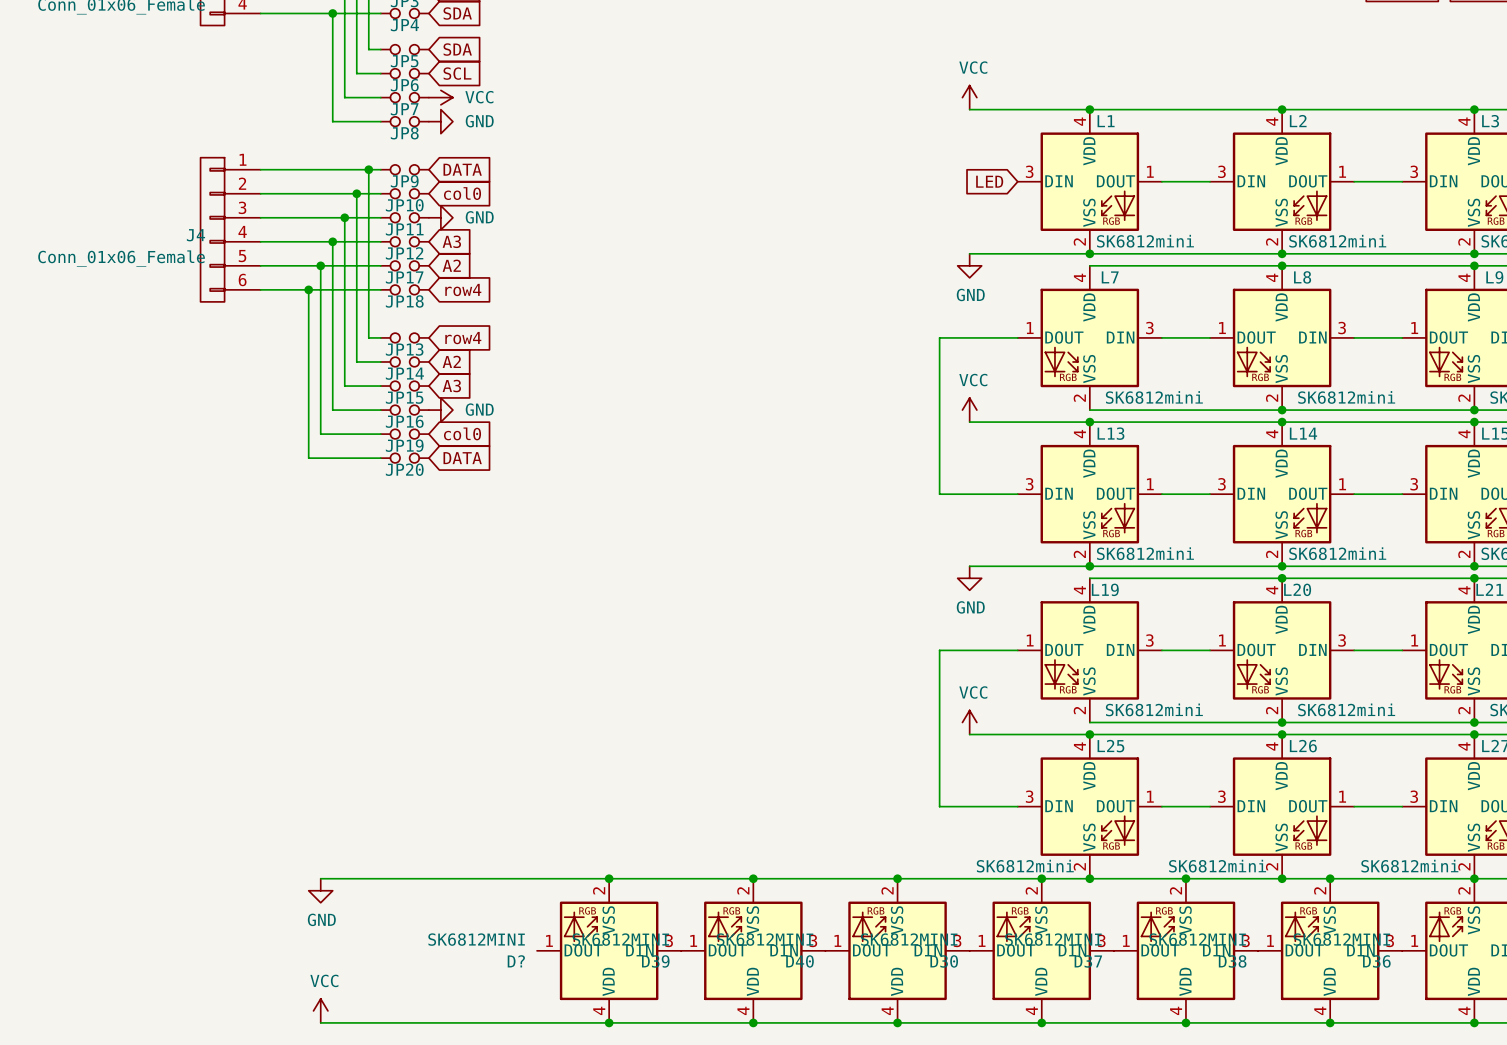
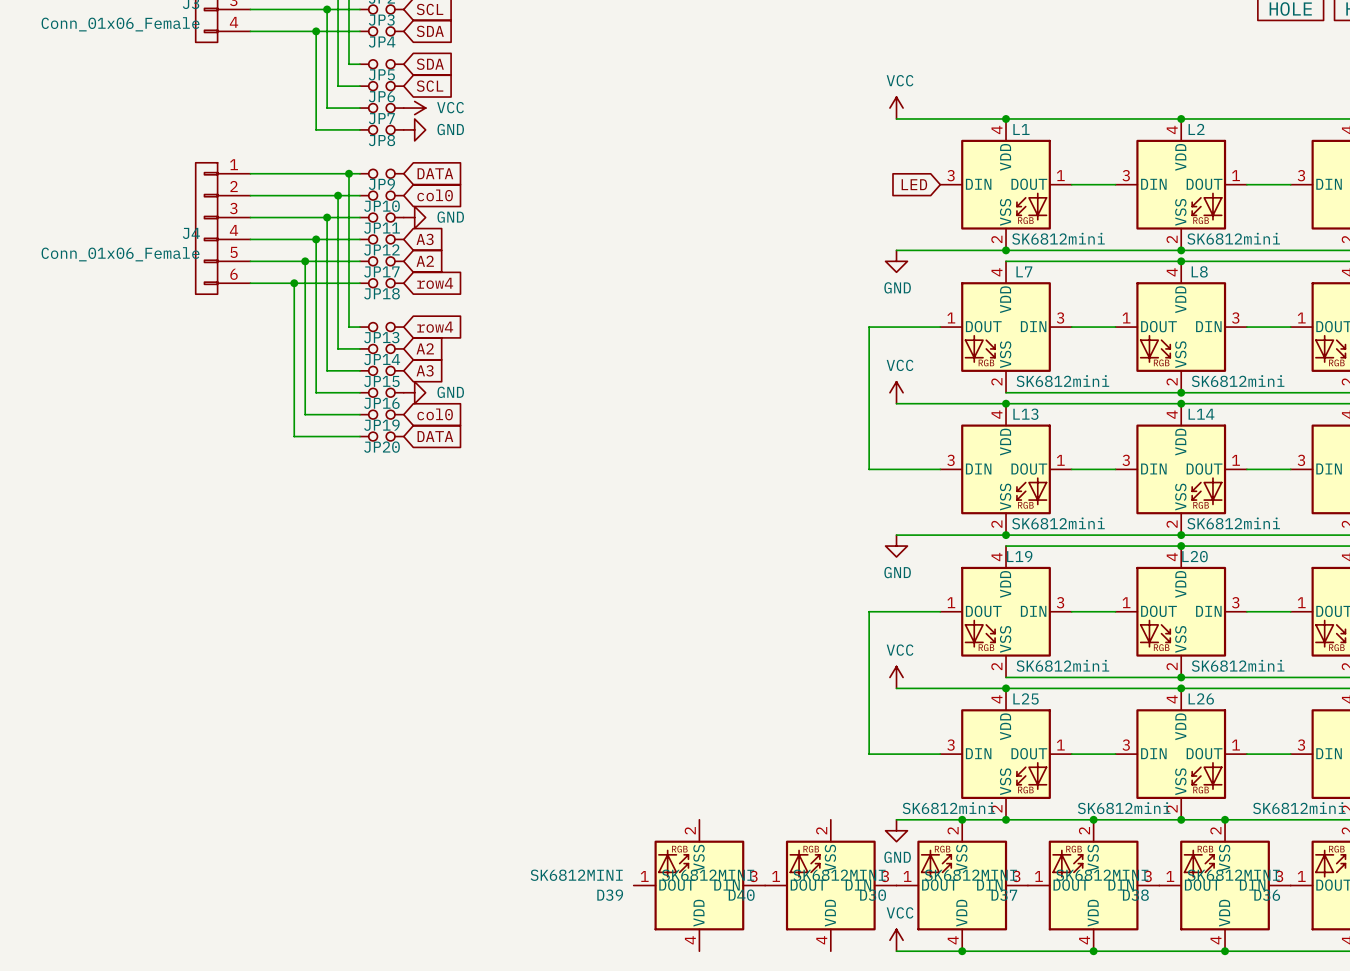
wire: (320, 878) (969, 878) -> none
junction: (609, 878) -> none
junction: (753, 878) -> none
junction: (897, 878) -> none
power symbol: GND (320, 890) -> none
power symbol: none -> GND (896, 830)
D?: SK6812MINI (609, 950) -> none
power symbol: VCC (320, 1010) -> none
power symbol: none -> VCC (896, 940)
wire: (320, 1022) (969, 1022) -> none
junction: (609, 1022) -> none
junction: (753, 1022) -> none
junction: (897, 1022) -> none

